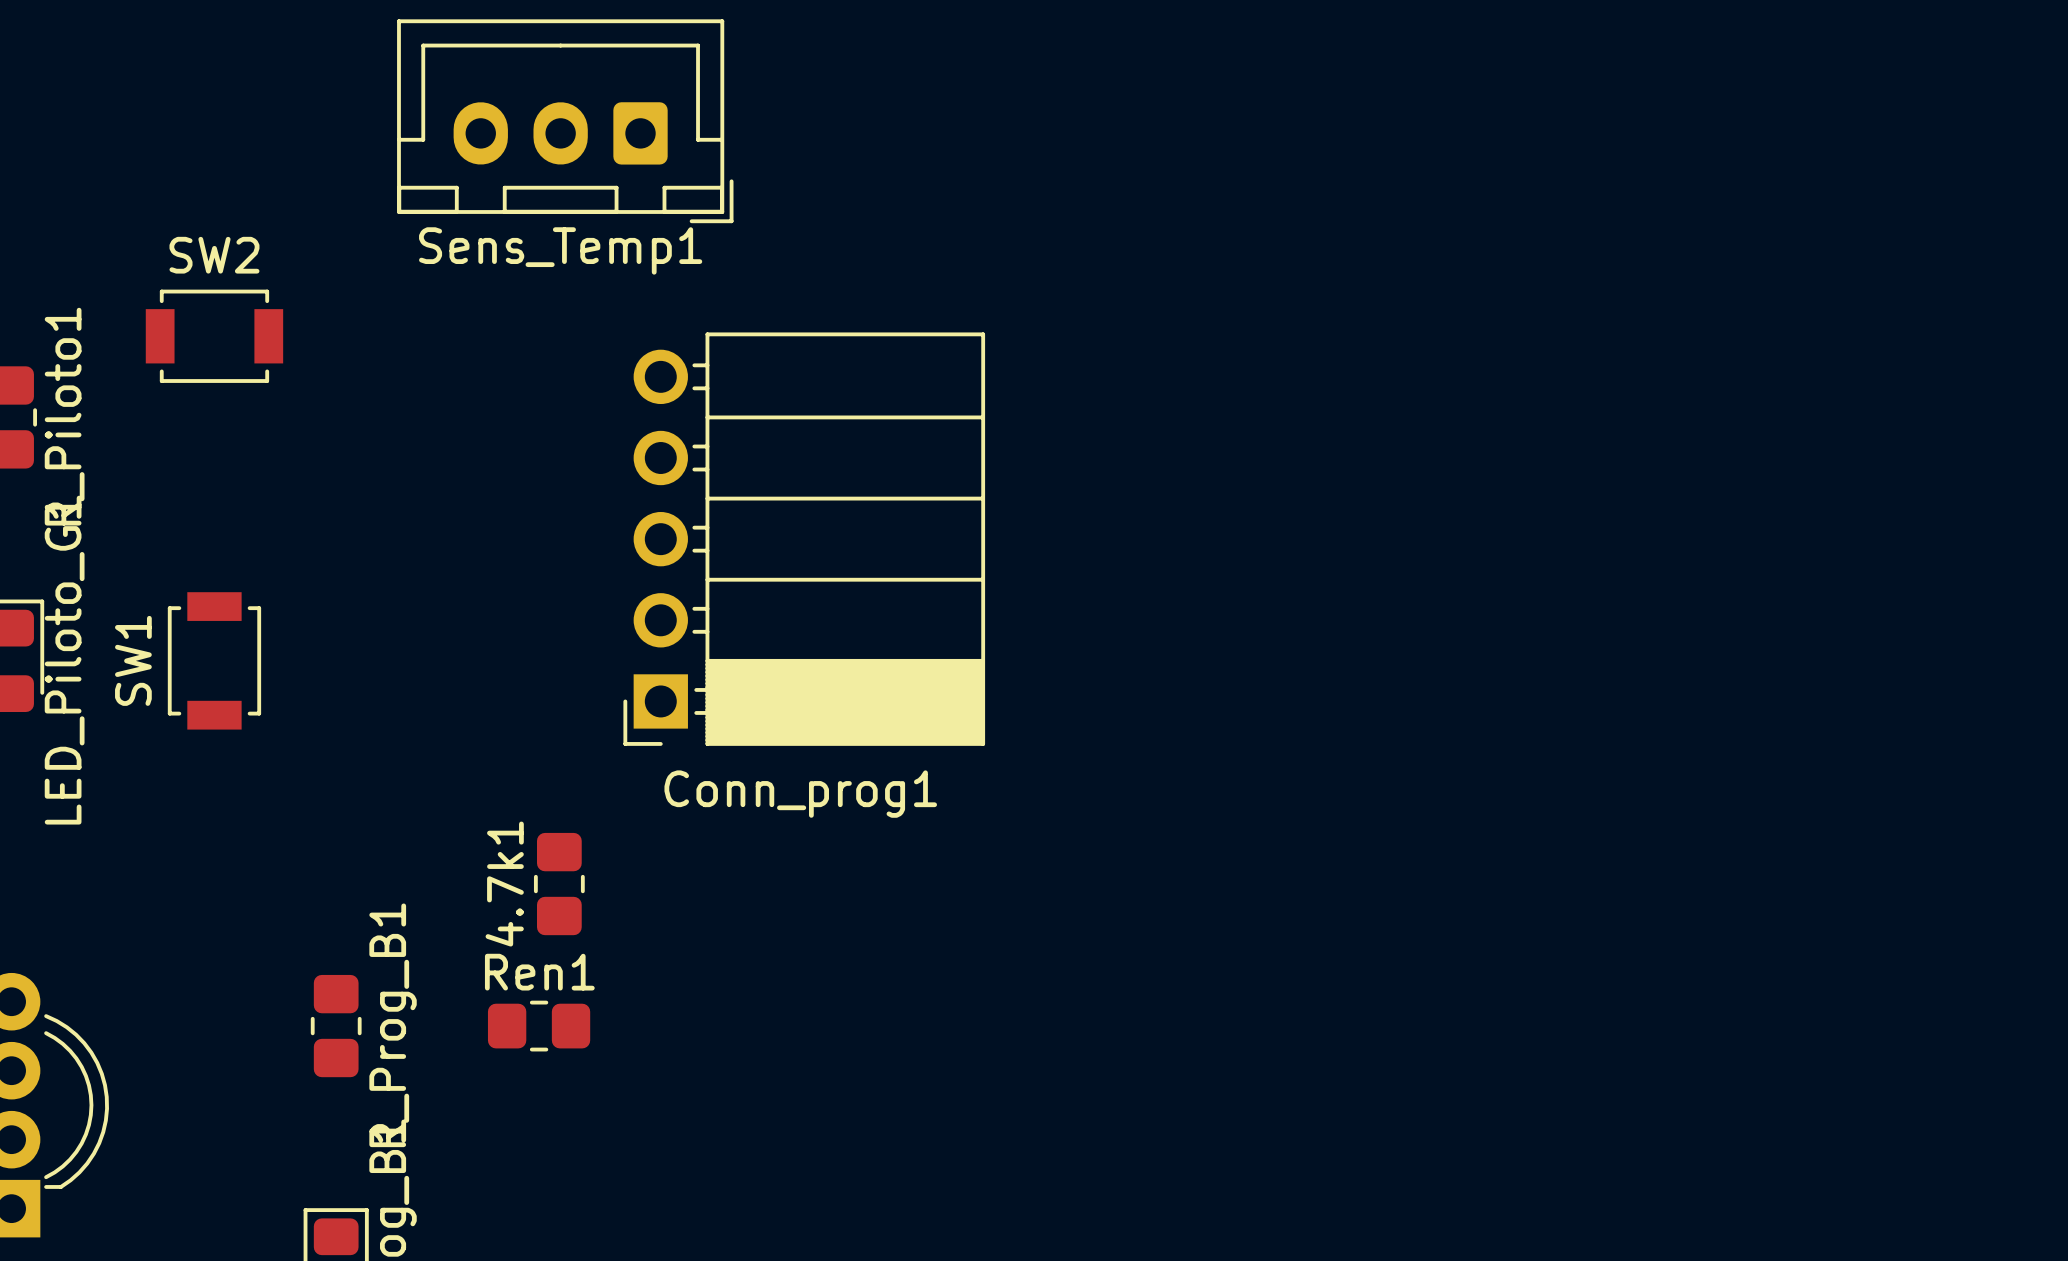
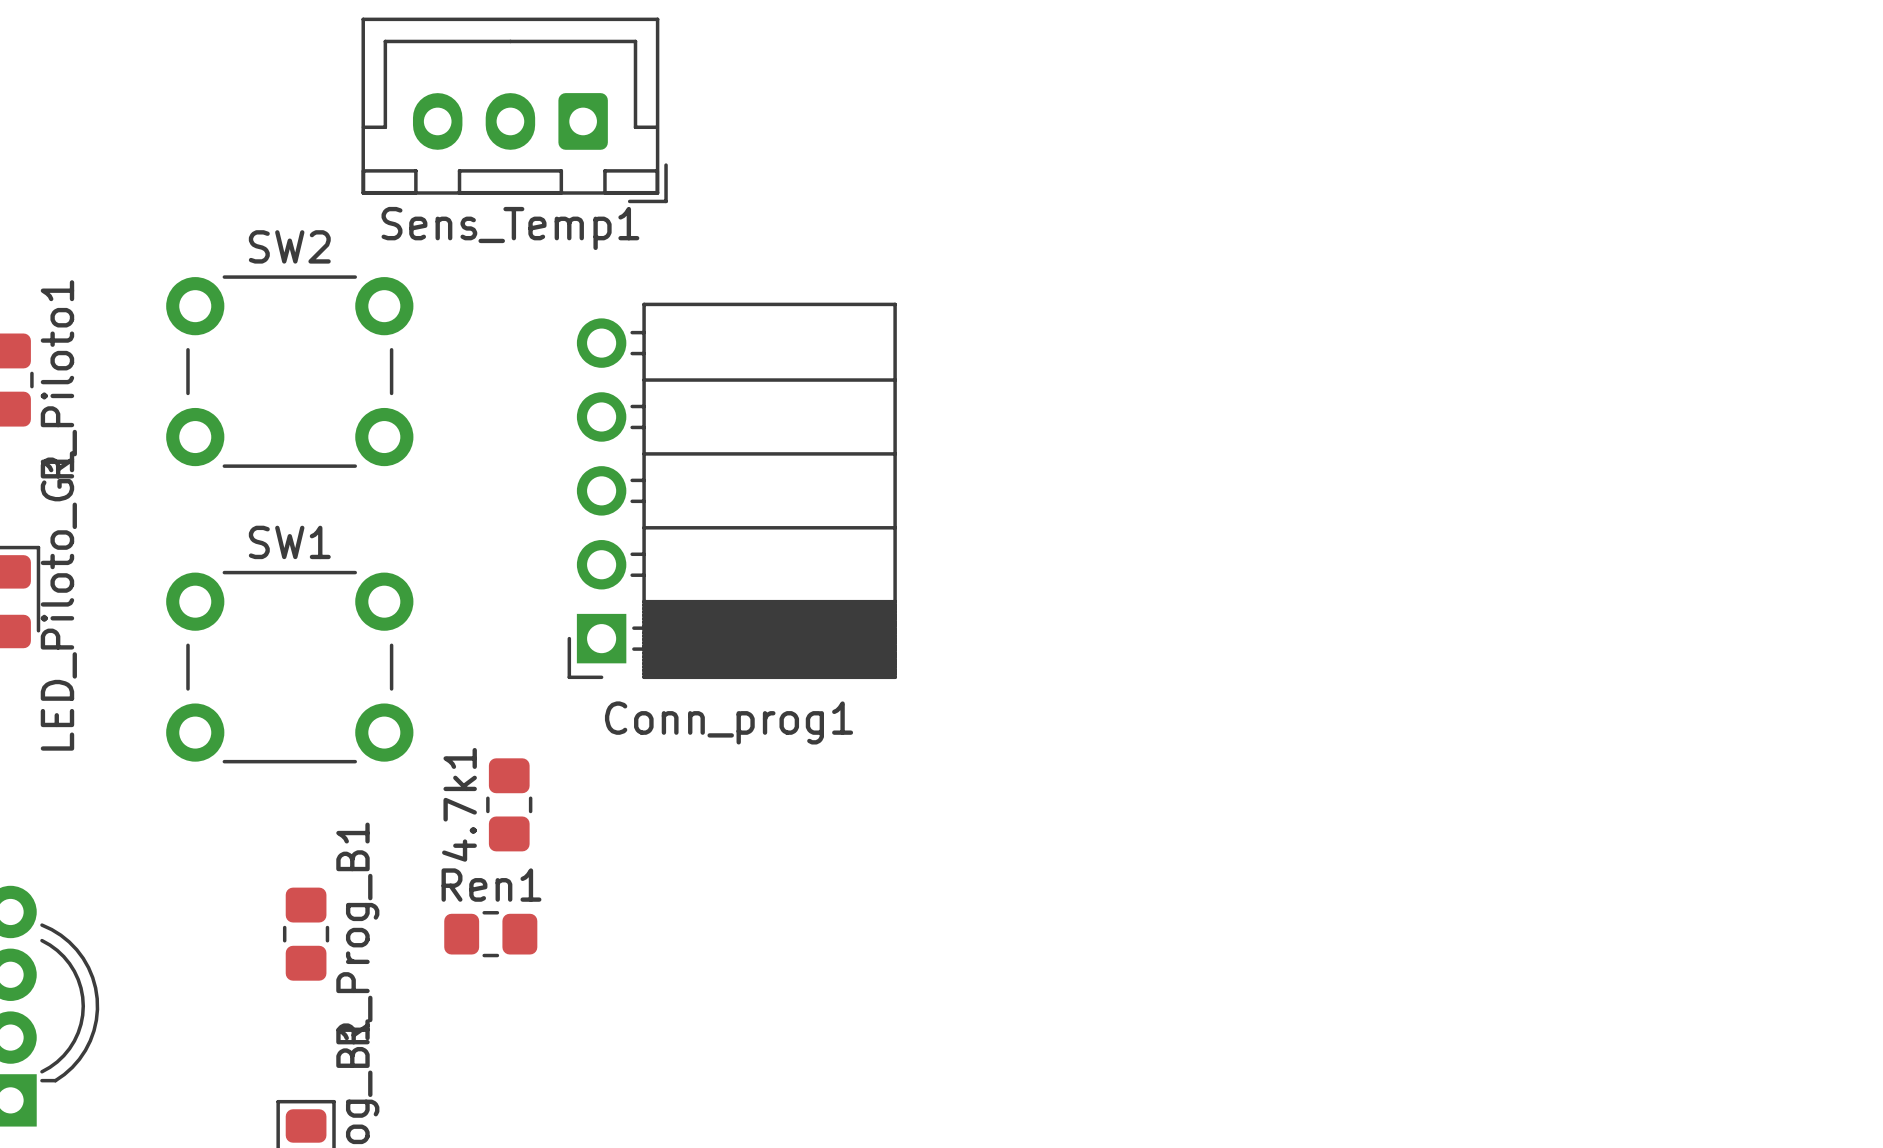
SW2 footprint: [145, 289, 284, 383] -> [166, 275, 414, 468]
SW1 footprint: [167, 592, 262, 730] -> [166, 570, 414, 764]
SW1 name position: SW1 (133, 660) -> SW1 (289, 542)

